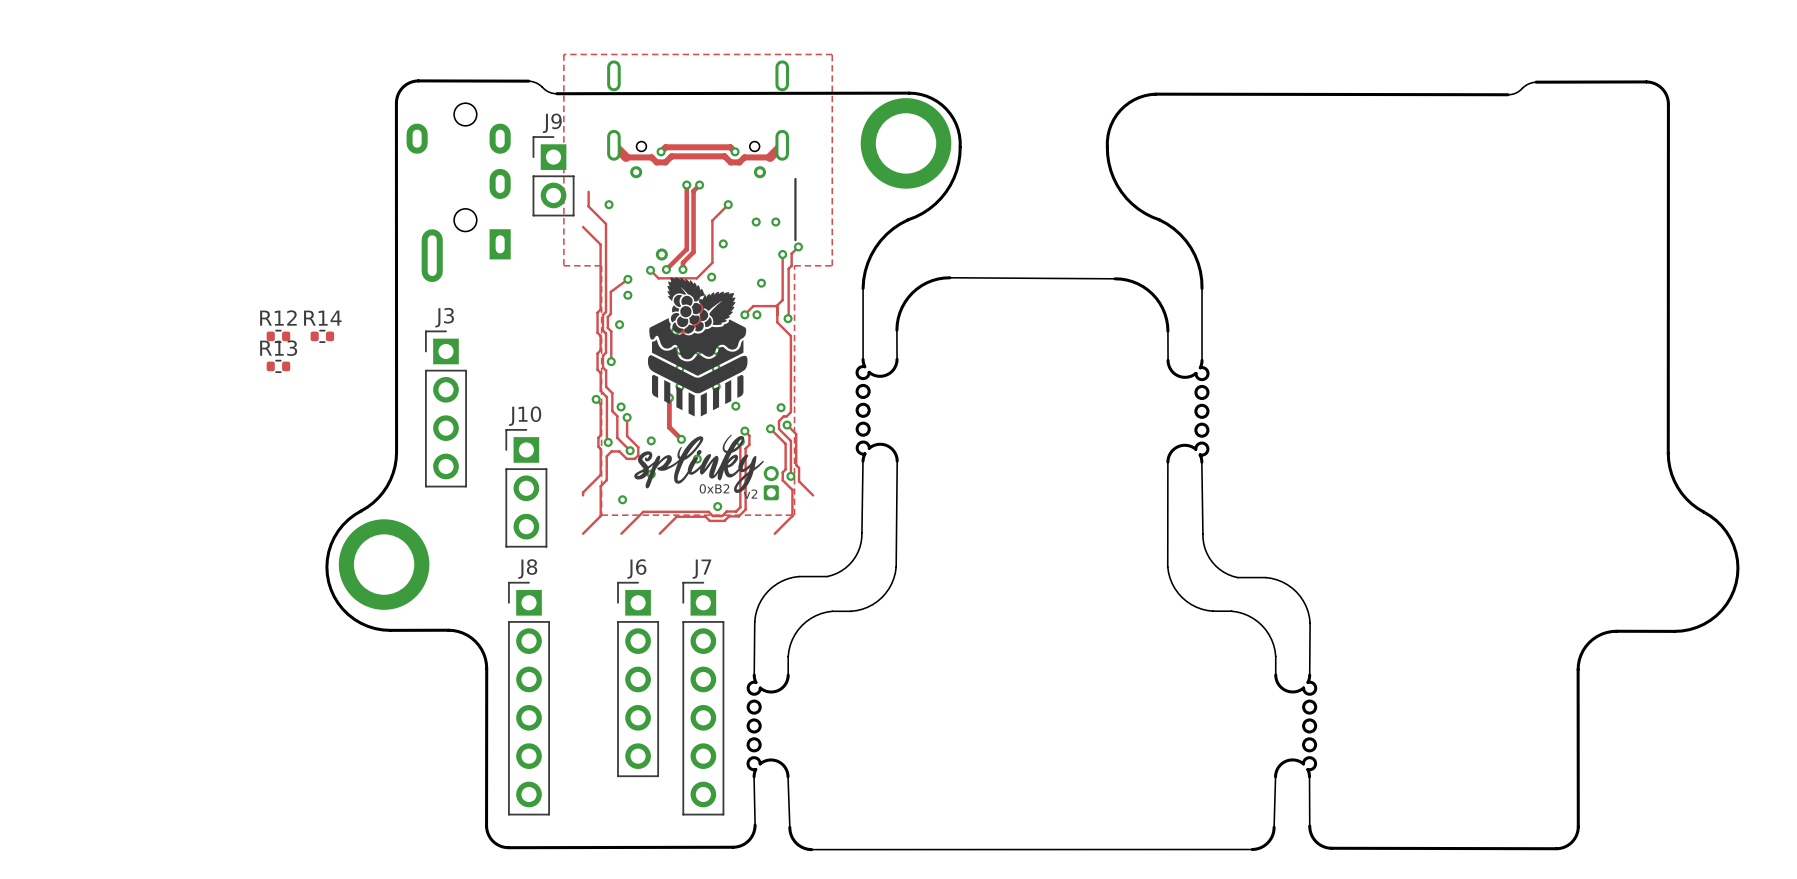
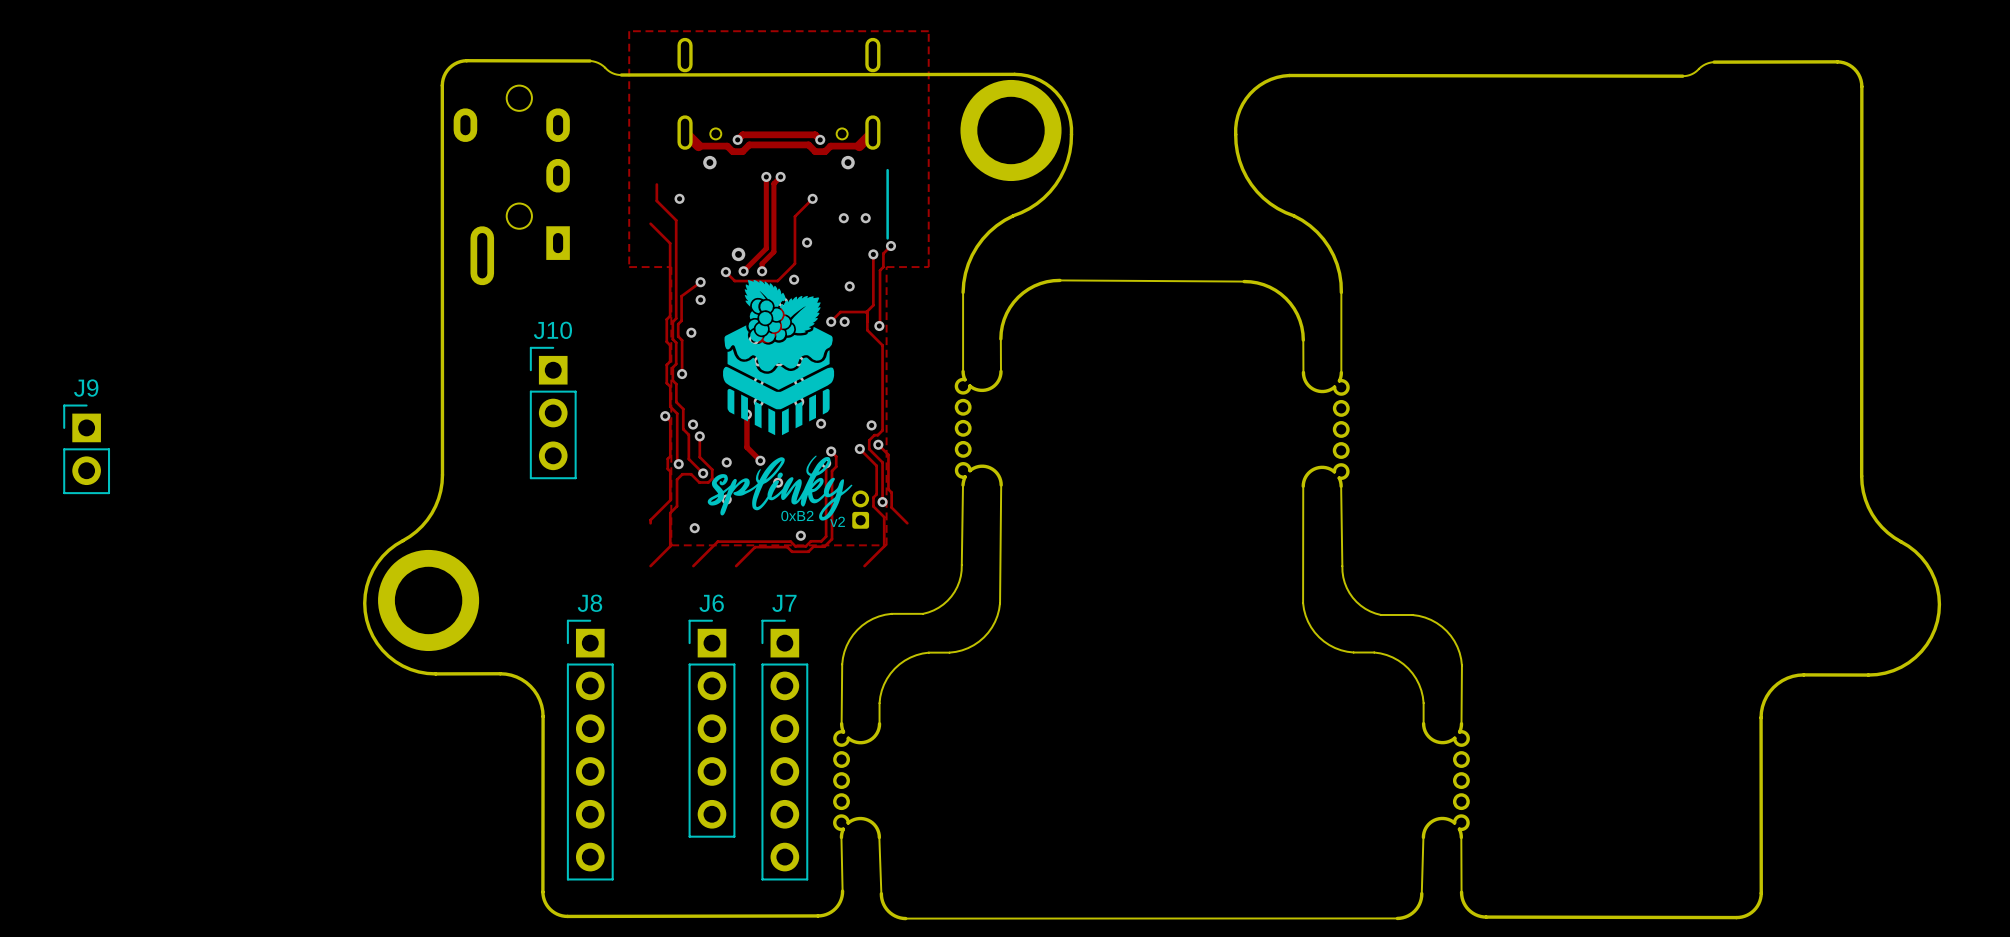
J9 position: (553, 176) -> (86, 449)
R12: (278, 336) -> none
R14: (322, 336) -> none
R13: (278, 366) -> none
J3: (445, 408) -> none
J10 position: (526, 488) -> (553, 413)

